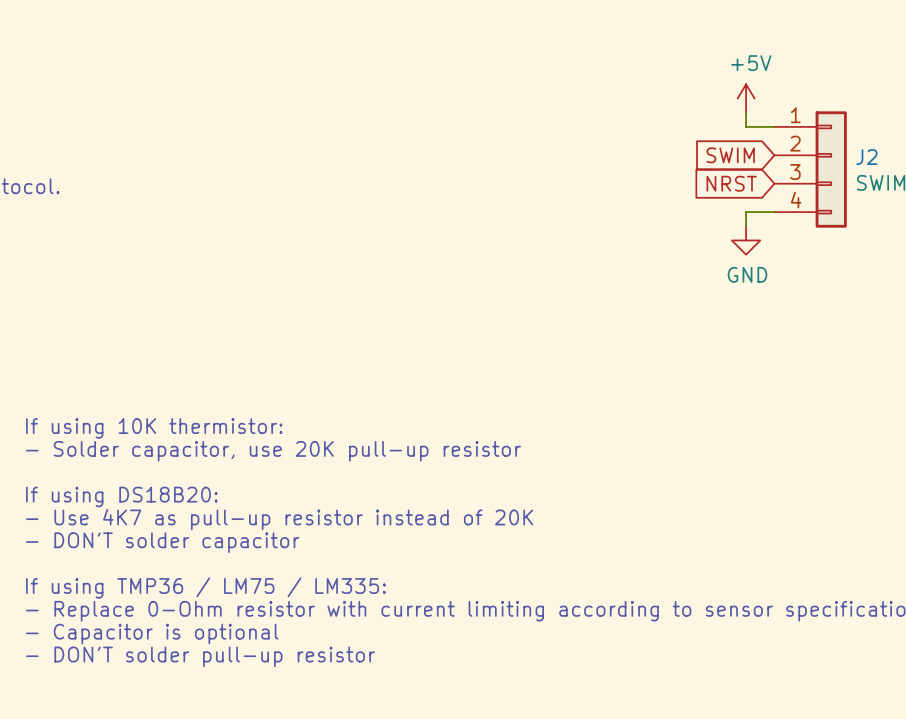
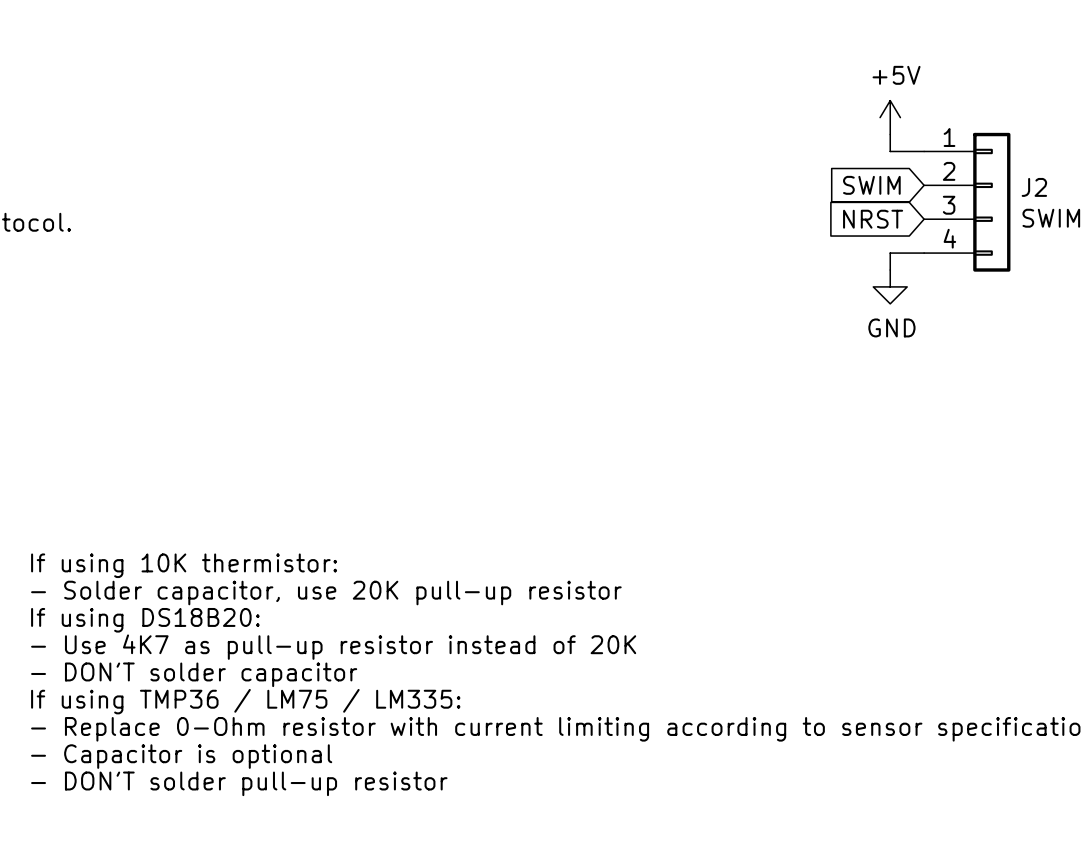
text position: If using 10K thermistor: (154, 428) -> If using 10K thermistor: (184, 565)
text: - Solder capacitor, use 20K pull-up resistor (273, 451) -> none
text: If using DS18B20: (121, 496) -> - Solder capacitor, use 20K pull-up resistor (326, 593)
text: - Use 4K7 as pull-up resistor instead of 20K (279, 519) -> If using DS18B20: (145, 620)
text: - DON'T solder capacitor (162, 542) -> - Use 4K7 as pull-up resistor instead of 20K (333, 647)
text: none -> - DON'T solder capacitor (194, 674)

